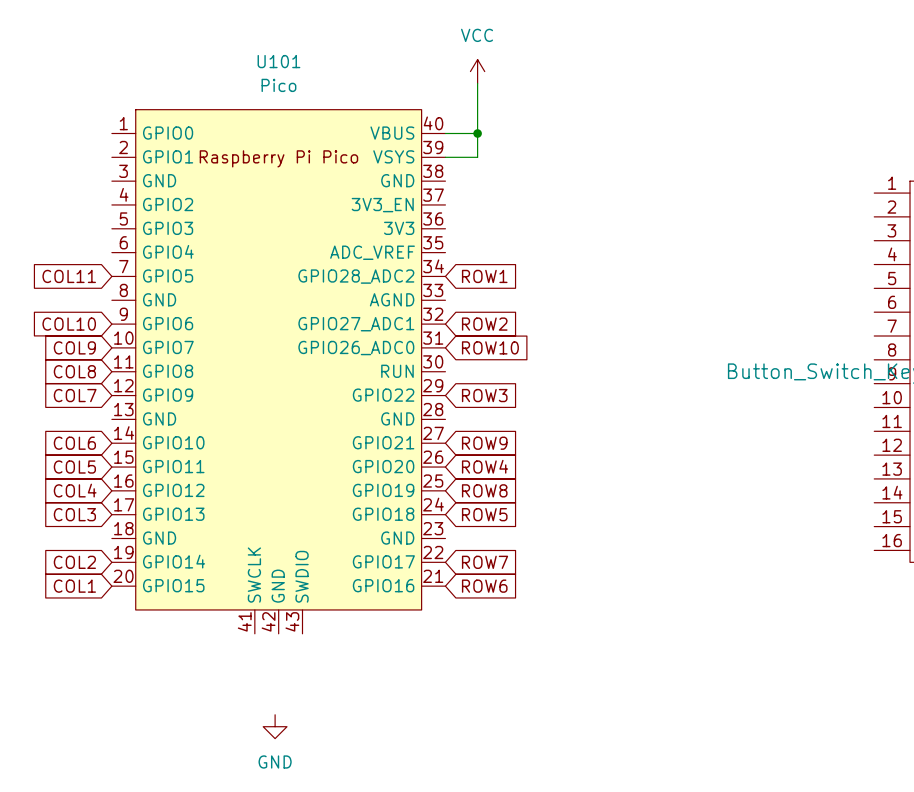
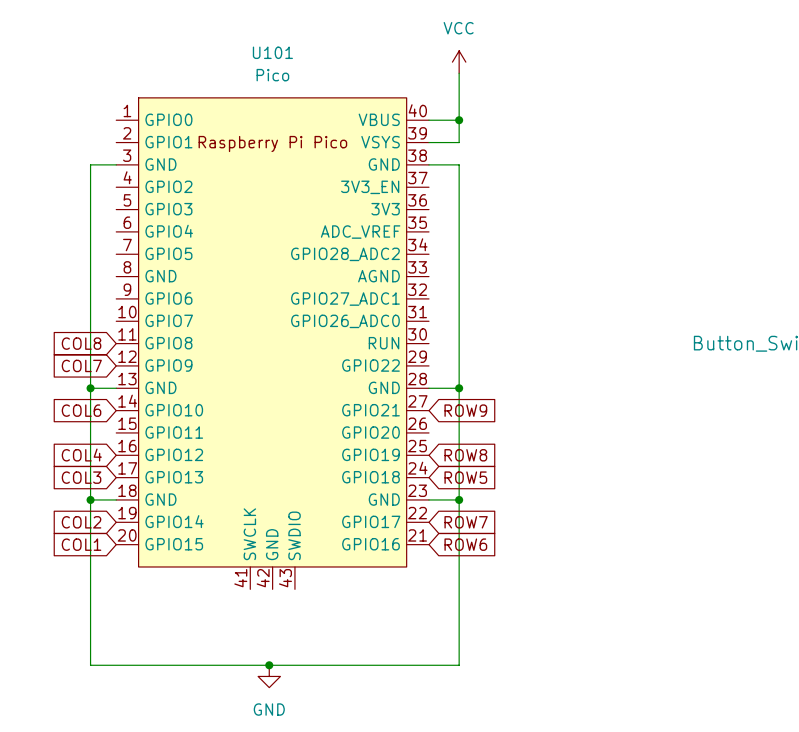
wire: none -> (116, 164) (90, 164) (90, 665) (459, 665) (459, 164) (428, 164)
global label: COL11 (69, 276) -> none
global label: ROW1 (484, 276) -> none
global label: COL10 (69, 324) -> none
global label: ROW2 (484, 324) -> none
global label: COL9 (74, 347) -> none
global label: ROW10 (490, 347) -> none
global label: ROW3 (484, 395) -> none
wire: none -> (90, 388) (116, 388)
junction: none -> (90, 388)
wire: none -> (428, 388) (459, 388)
junction: none -> (459, 388)
global label: ROW4 (485, 466) -> none
global label: COL5 (74, 467) -> none
wire: none -> (90, 499) (116, 499)
junction: none -> (90, 499)
wire: none -> (428, 499) (459, 499)
junction: none -> (459, 499)
junction: none -> (269, 665)

